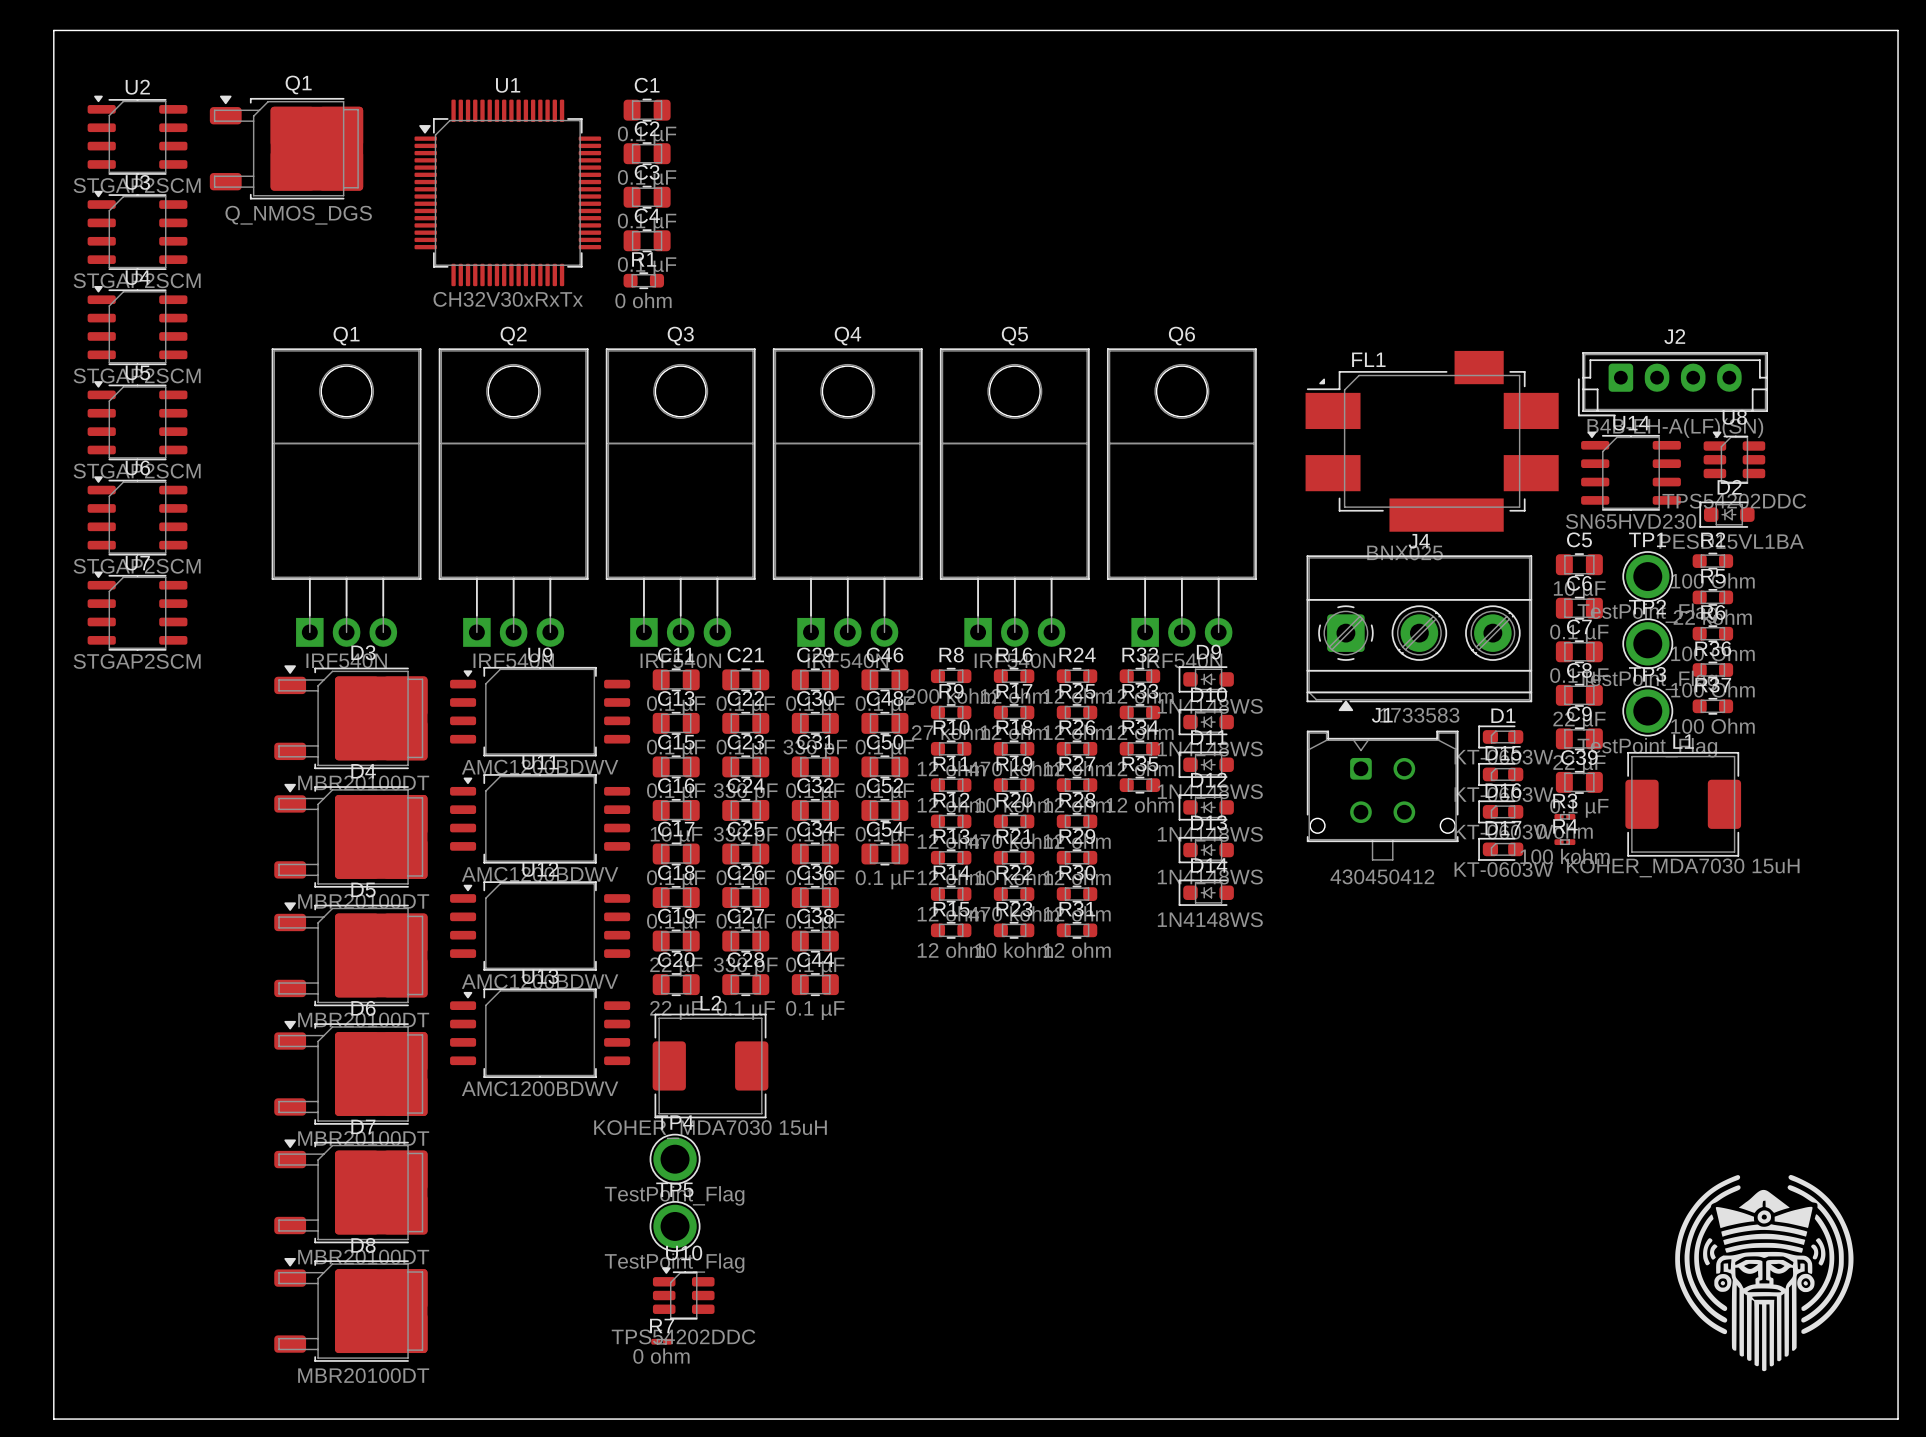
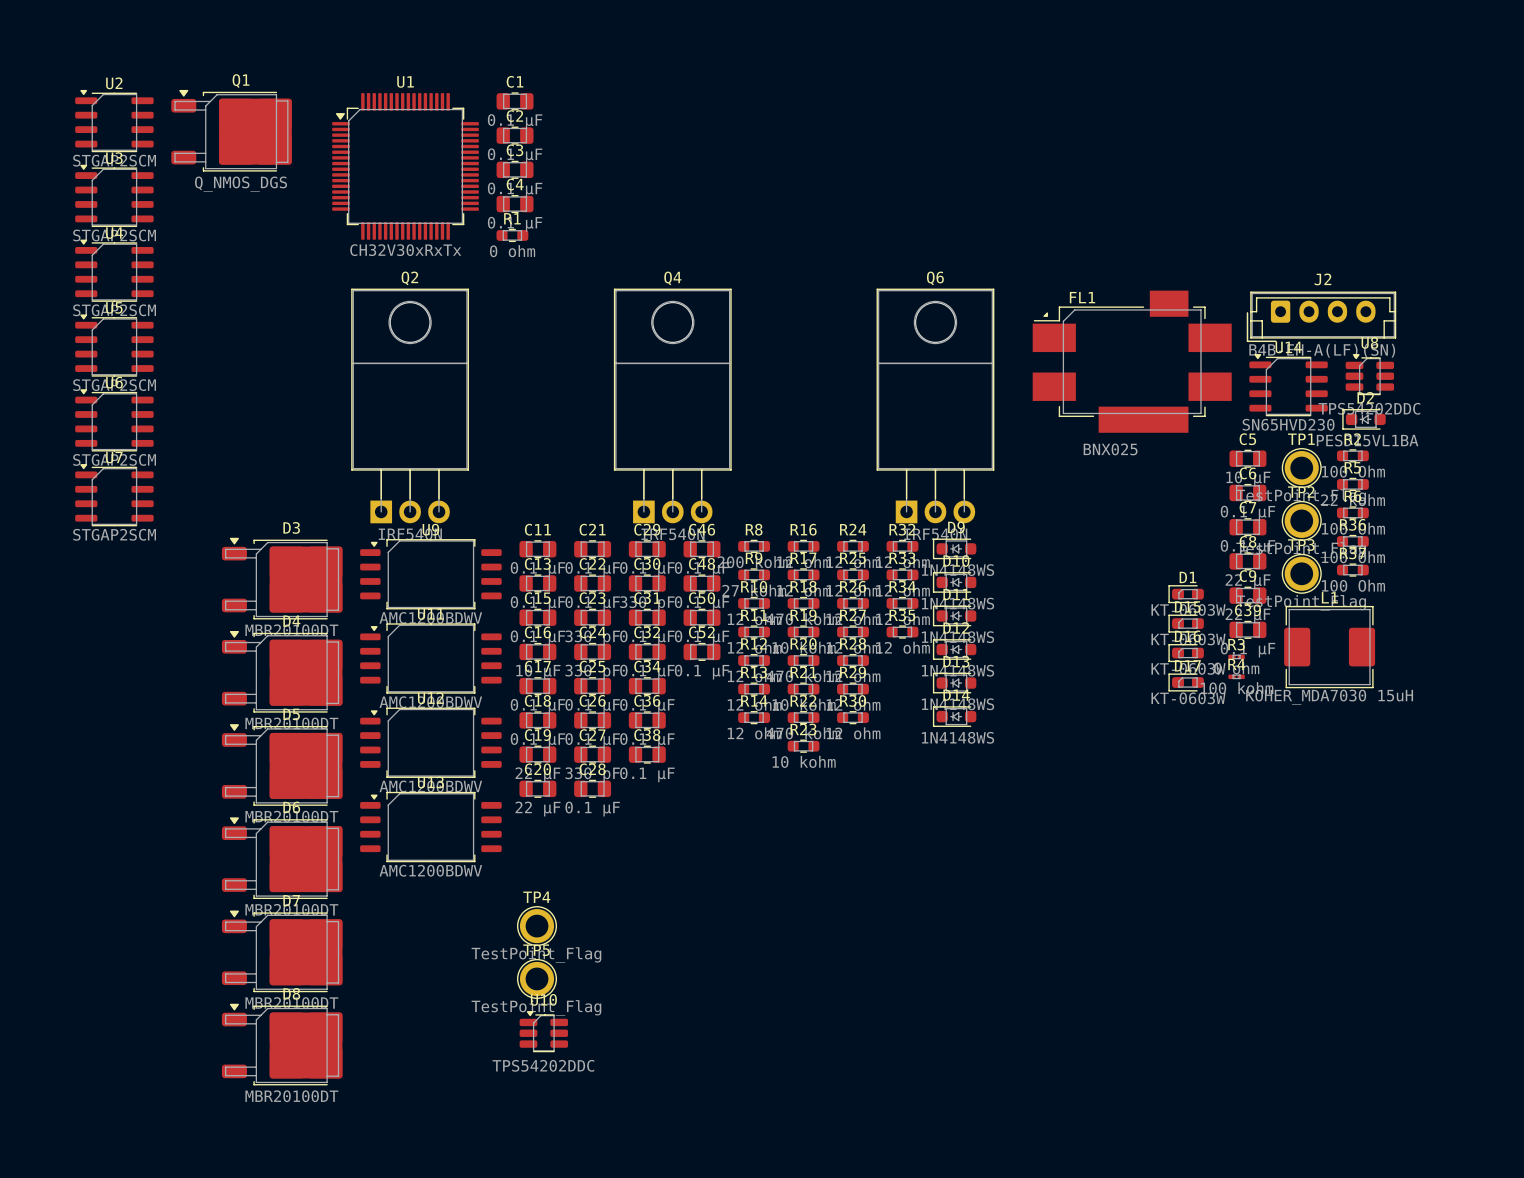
board edge: (53, 30) (1898, 30) (1898, 1419) (53, 1419) (53, 30) -> none
Q1: IRF540N (346, 497) -> none
Q3: IRF540N (680, 497) -> none
Q5: IRF540N (1014, 497) -> none
J4: 1733583 (1419, 633) -> none
J1: 430450412 (1382, 795) -> none
C54: 0.1 µF (884, 853) -> none
R15: 12 ohm (951, 930) -> none
R31: 12 ohm (1077, 930) -> none
C44: 0.1 µF (815, 984) -> none
L2: KOHER_MDA7030 15uH (710, 1065) -> none
drawing: [1675, 1174, 1854, 1372] -> none
R7: 0 ohm (661, 1341) -> none

